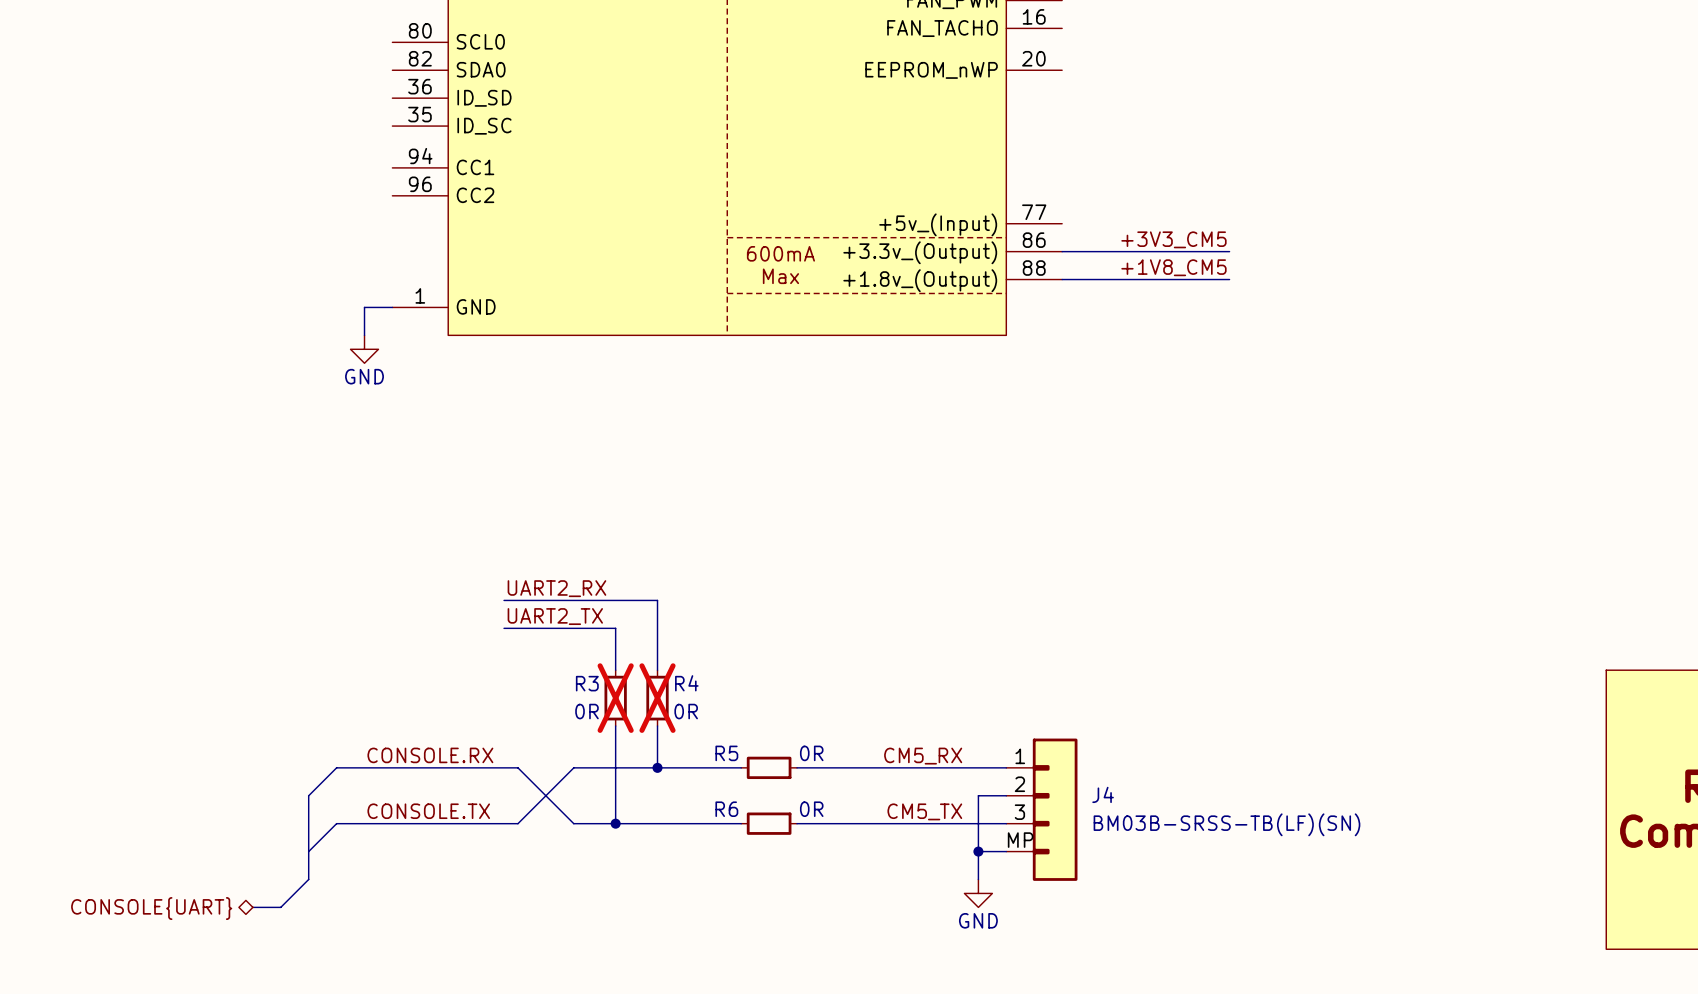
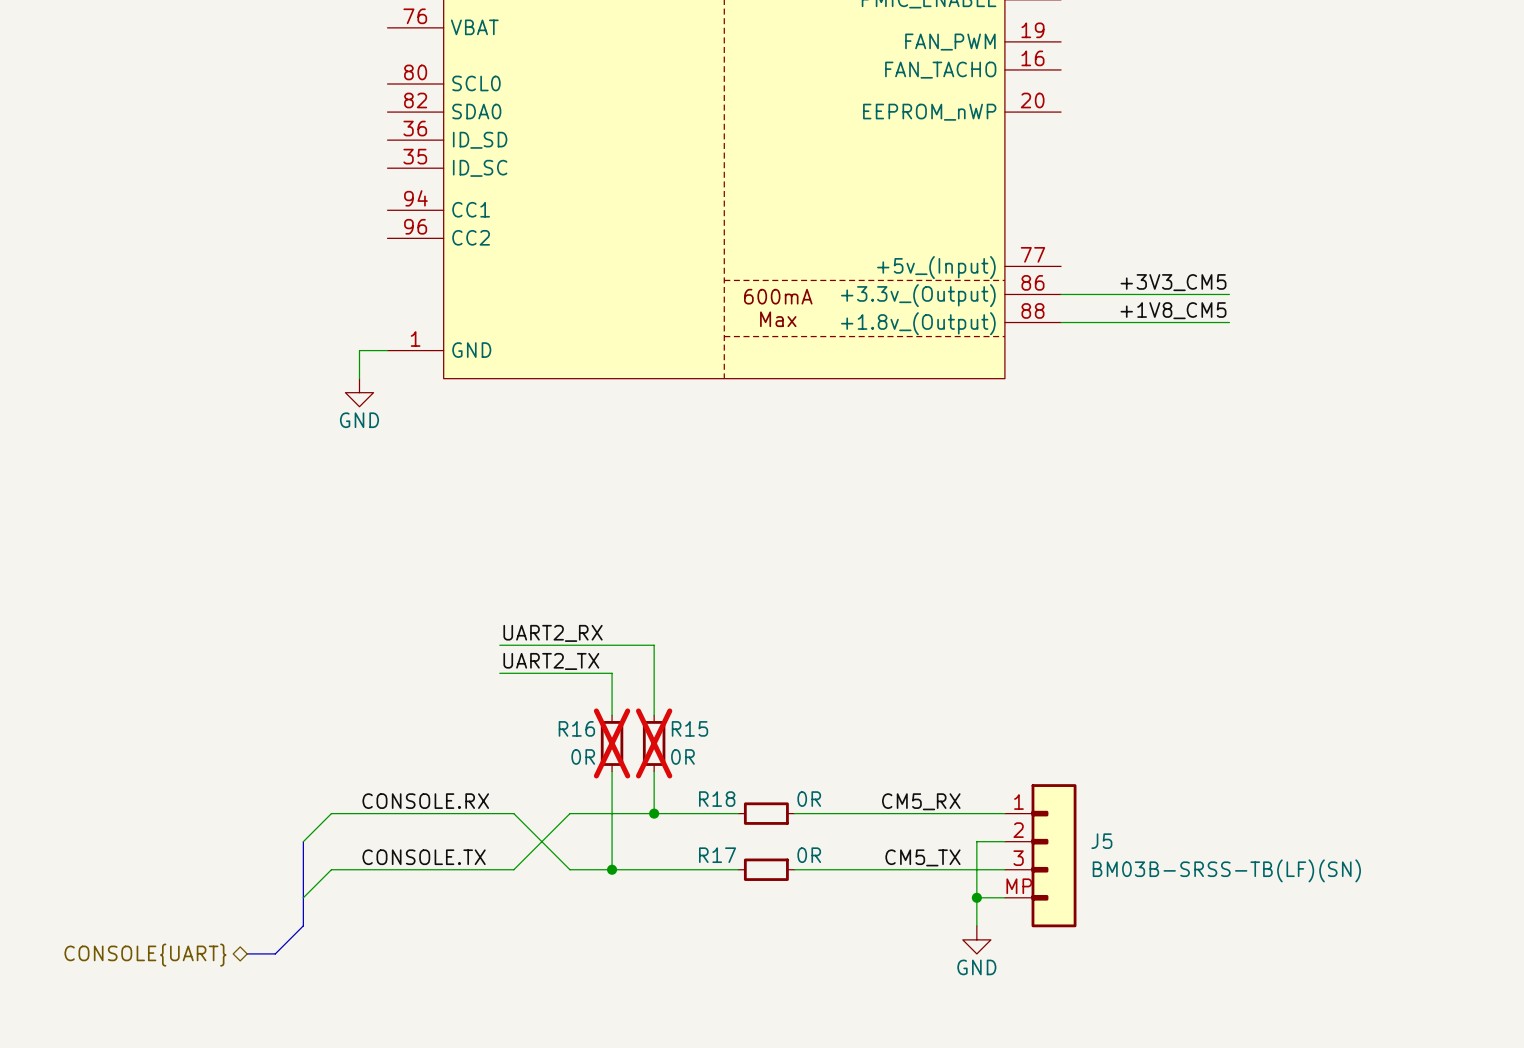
R3 name: R3 (587, 683) -> R16 (576, 728)
R4 name: R4 (686, 683) -> R15 (689, 728)
R5 name: R5 (726, 753) -> R18 (717, 799)
J4 name: J4 (1103, 794) -> J5 (1101, 841)
R6 name: R6 (726, 809) -> R17 (717, 855)

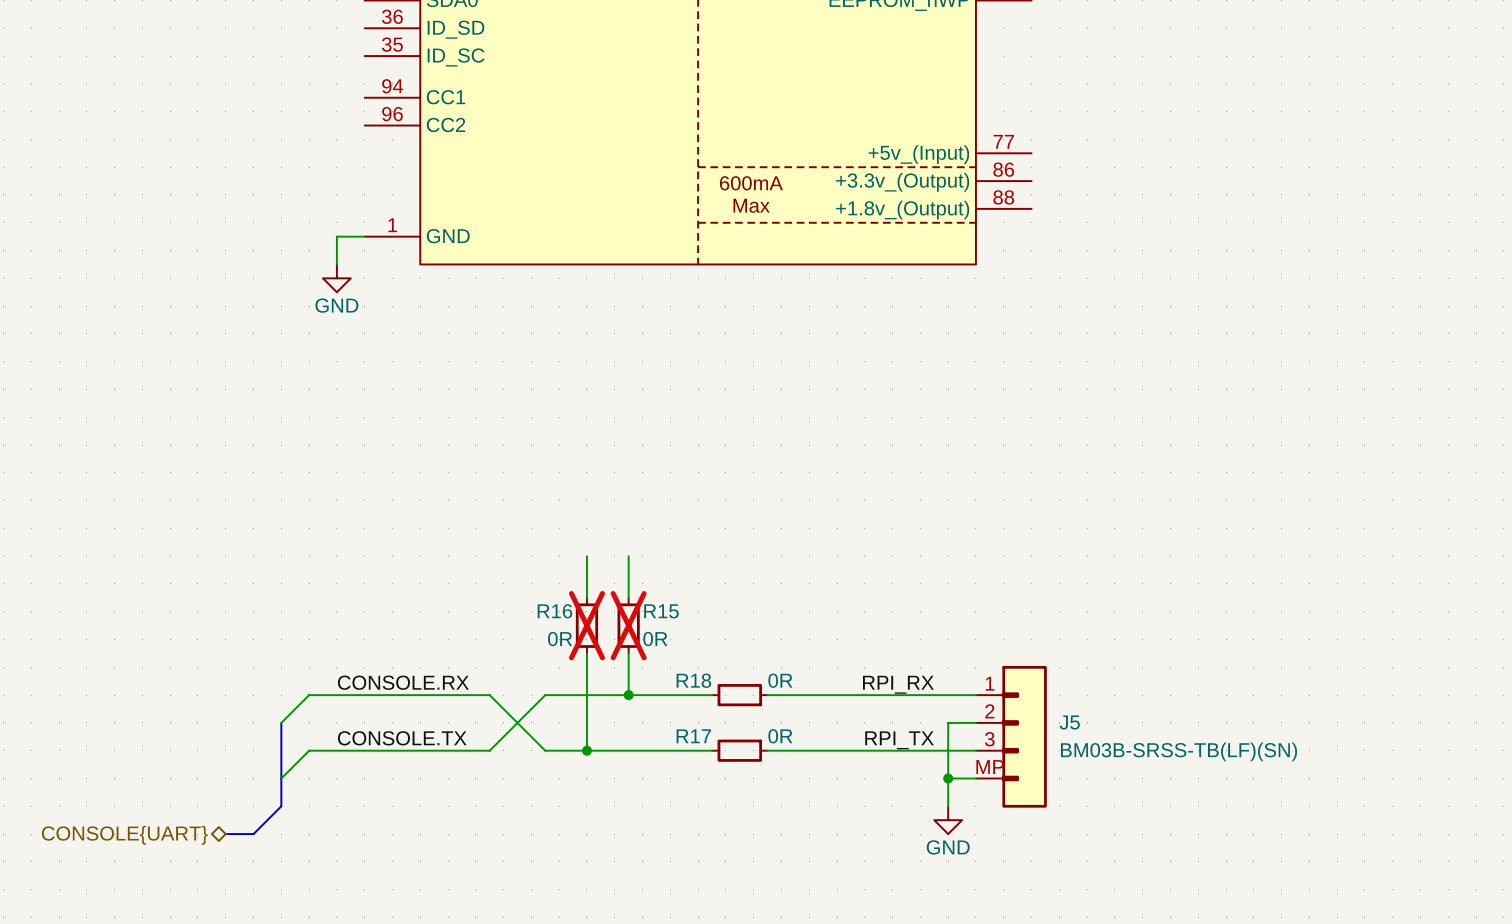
label: +3V3_CM5 (1173, 282) -> none
wire: (1061, 294) (1229, 294) -> none
label: +1V8_CM5 (1173, 310) -> none
wire: (1061, 322) (1229, 322) -> none
label: UART2_RX (553, 633) -> none
wire: (499, 645) (654, 645) (654, 673) -> none
label: UART2_TX (551, 661) -> none
wire: (499, 673) (612, 673) -> none
label: CM5_RX (921, 801) -> RPI_RX (898, 684)
label: CM5_TX (922, 857) -> RPI_TX (899, 740)

